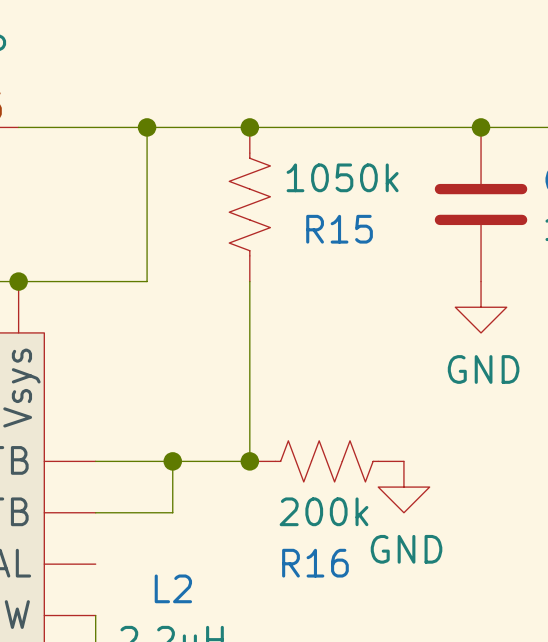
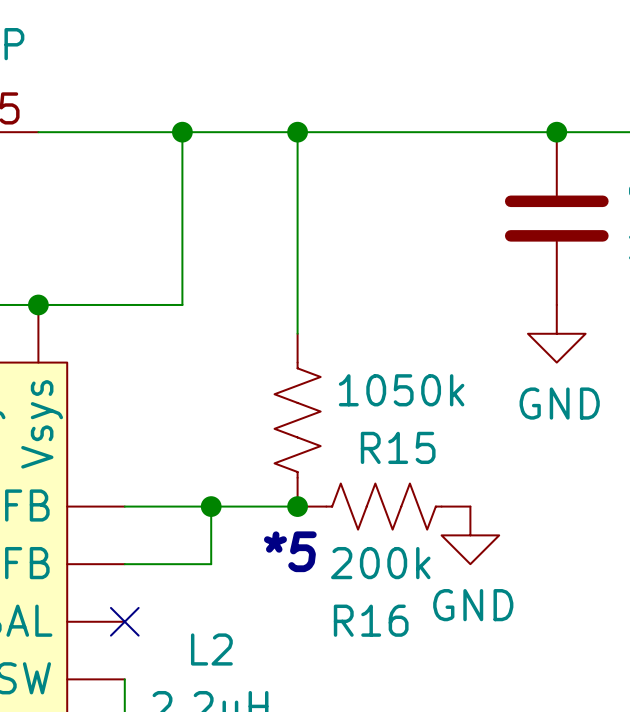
R15 position: (249, 204) -> (297, 420)
wire: (249, 307) (249, 461) -> (297, 132) (297, 304)
text: none -> *5 (290, 551)
no-connect mark: none -> (124, 621)

